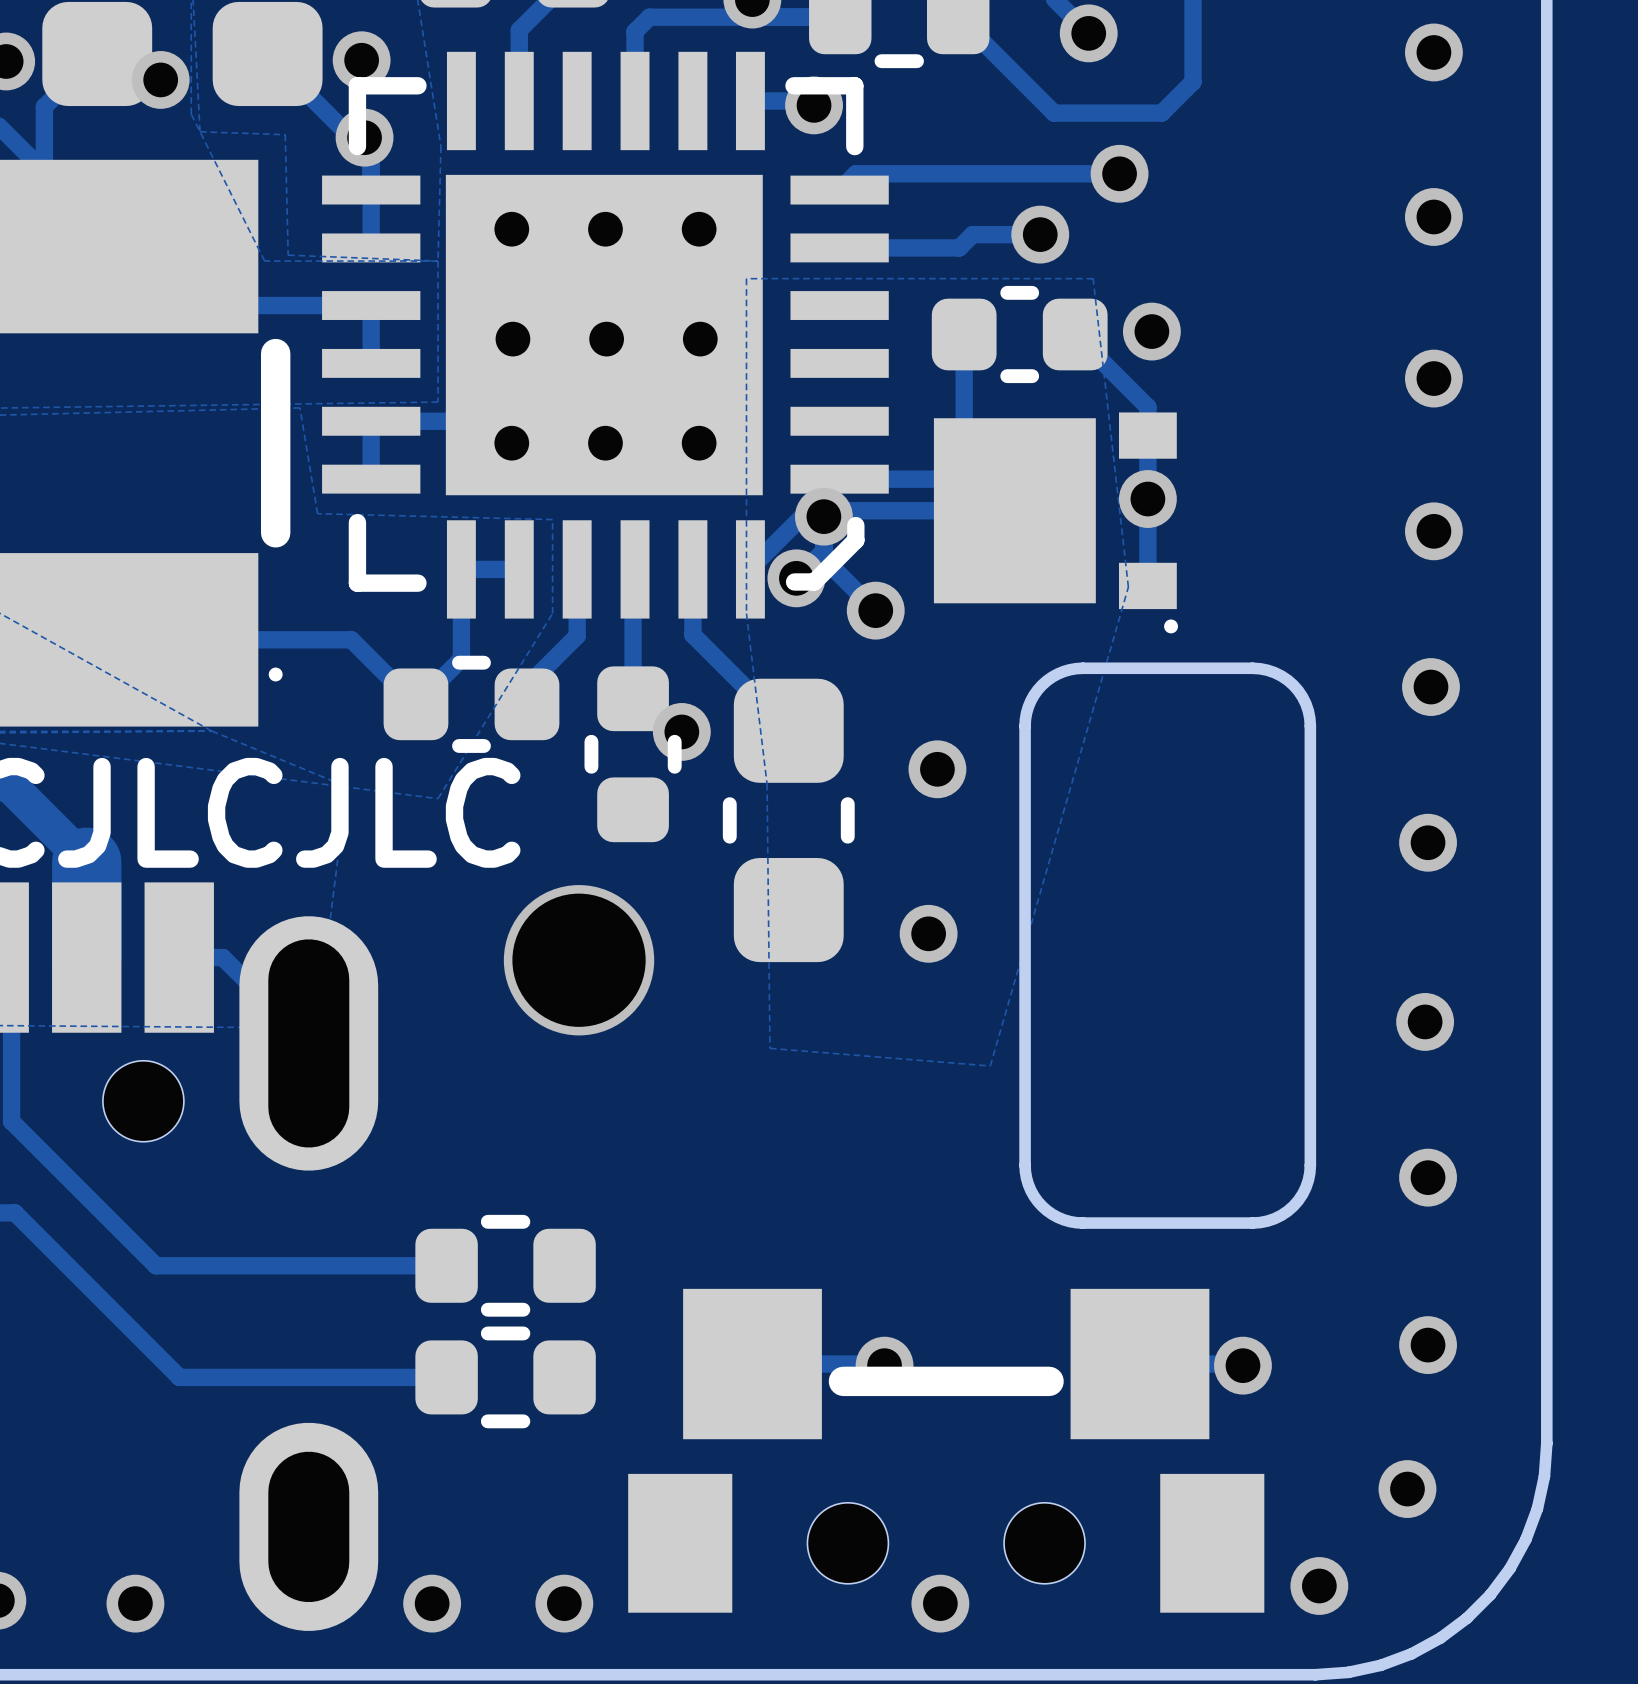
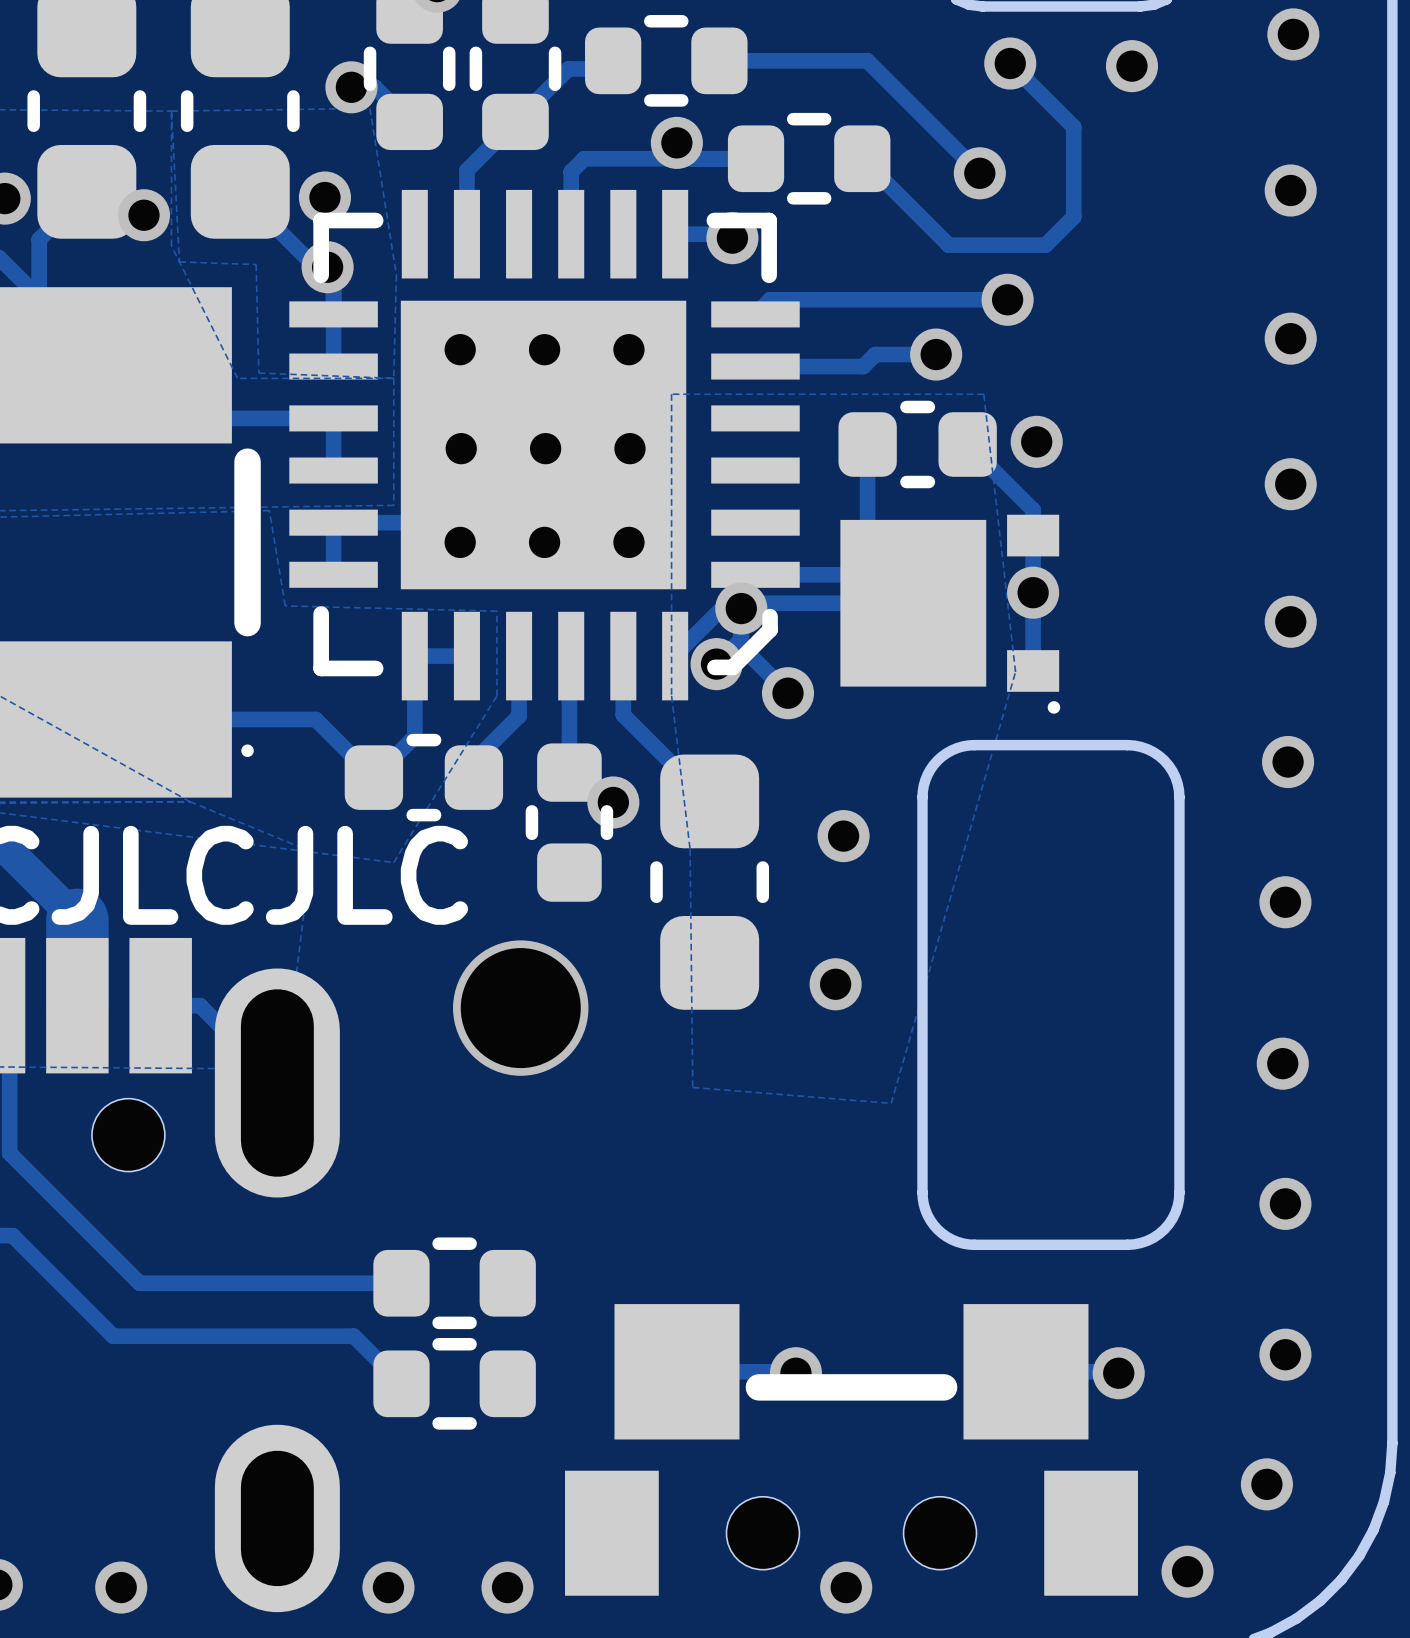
track: (126, 1324) (179, 1377) (446, 1377) -> (113, 1336) (353, 1336) (401, 1383)

